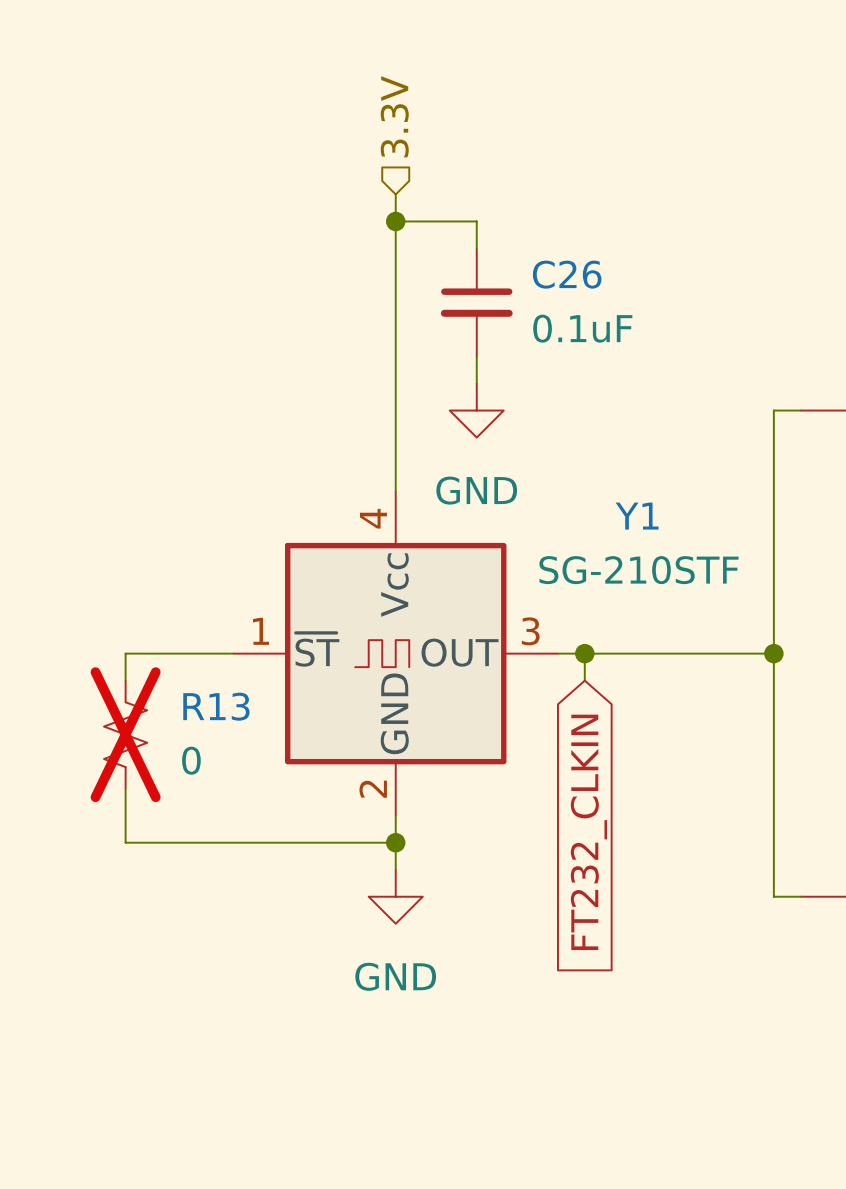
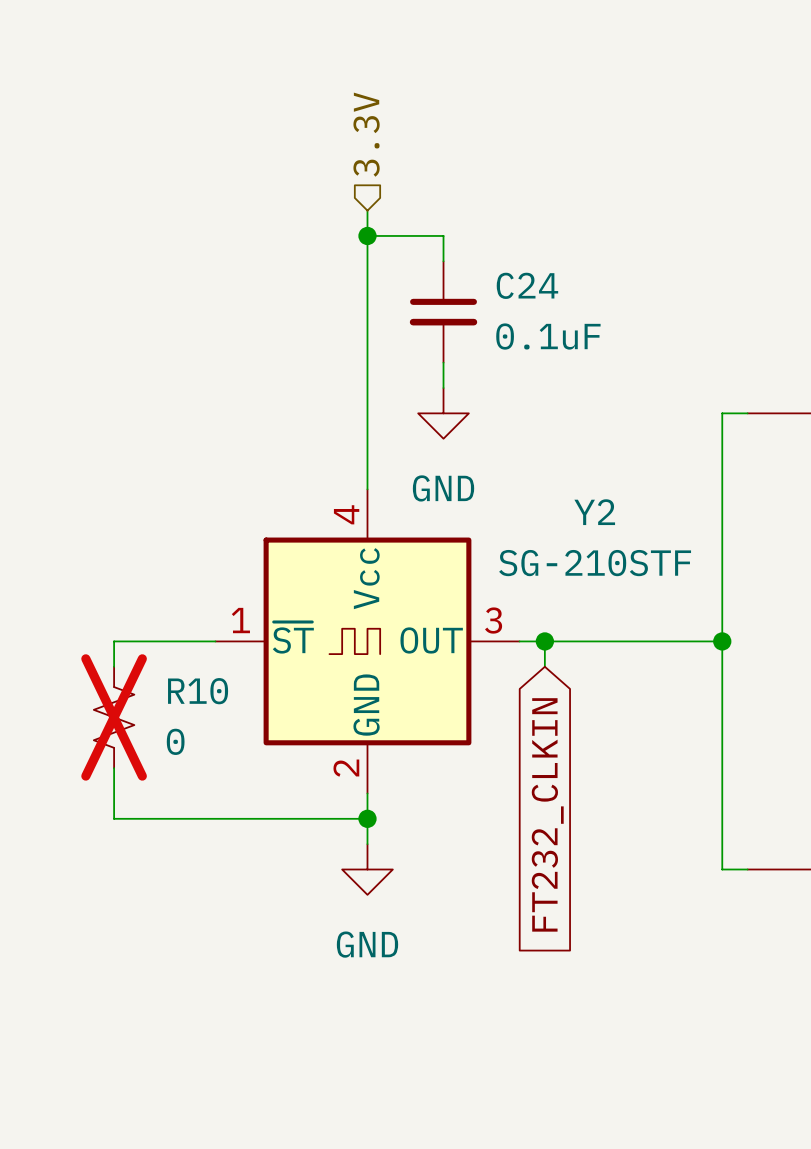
C26 name: C26 (567, 274) -> C24 (527, 285)
Y1 name: Y1 (637, 516) -> Y2 (594, 512)
R13 name: R13 (216, 706) -> R10 (198, 691)

